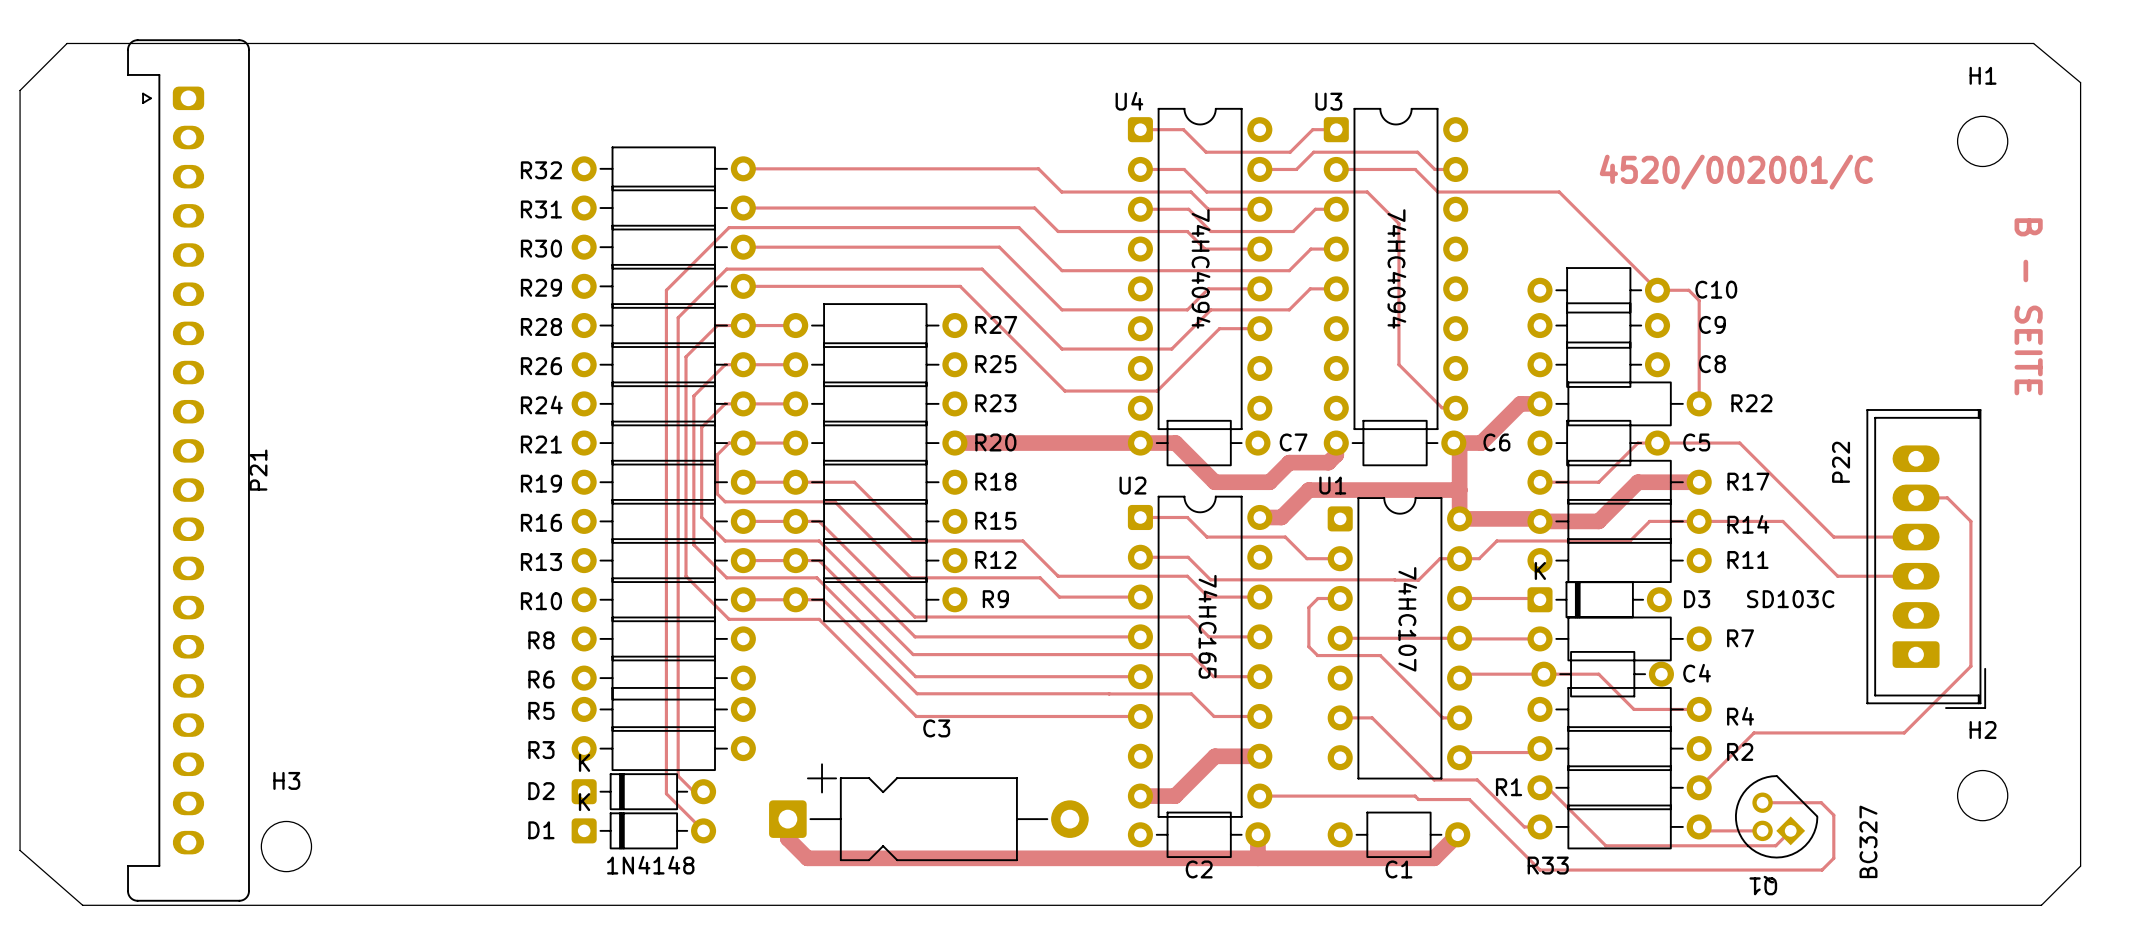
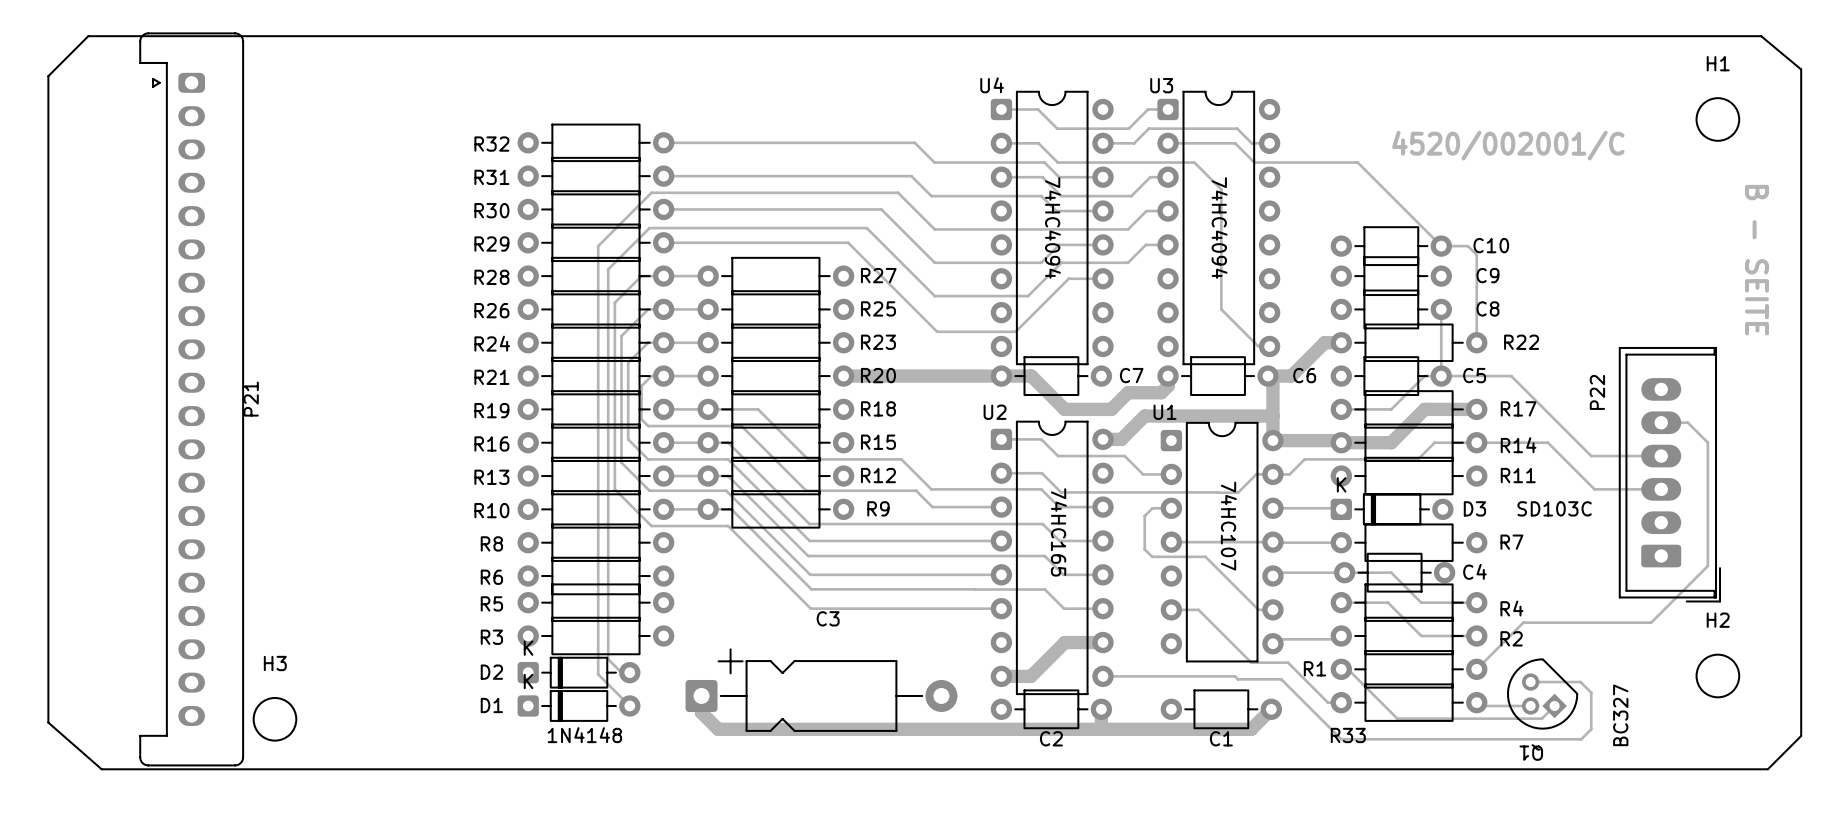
track: none -> (1441, 309) (1441, 376)
track: none -> (1341, 602) (1388, 602) (1421, 636) (1476, 636)

